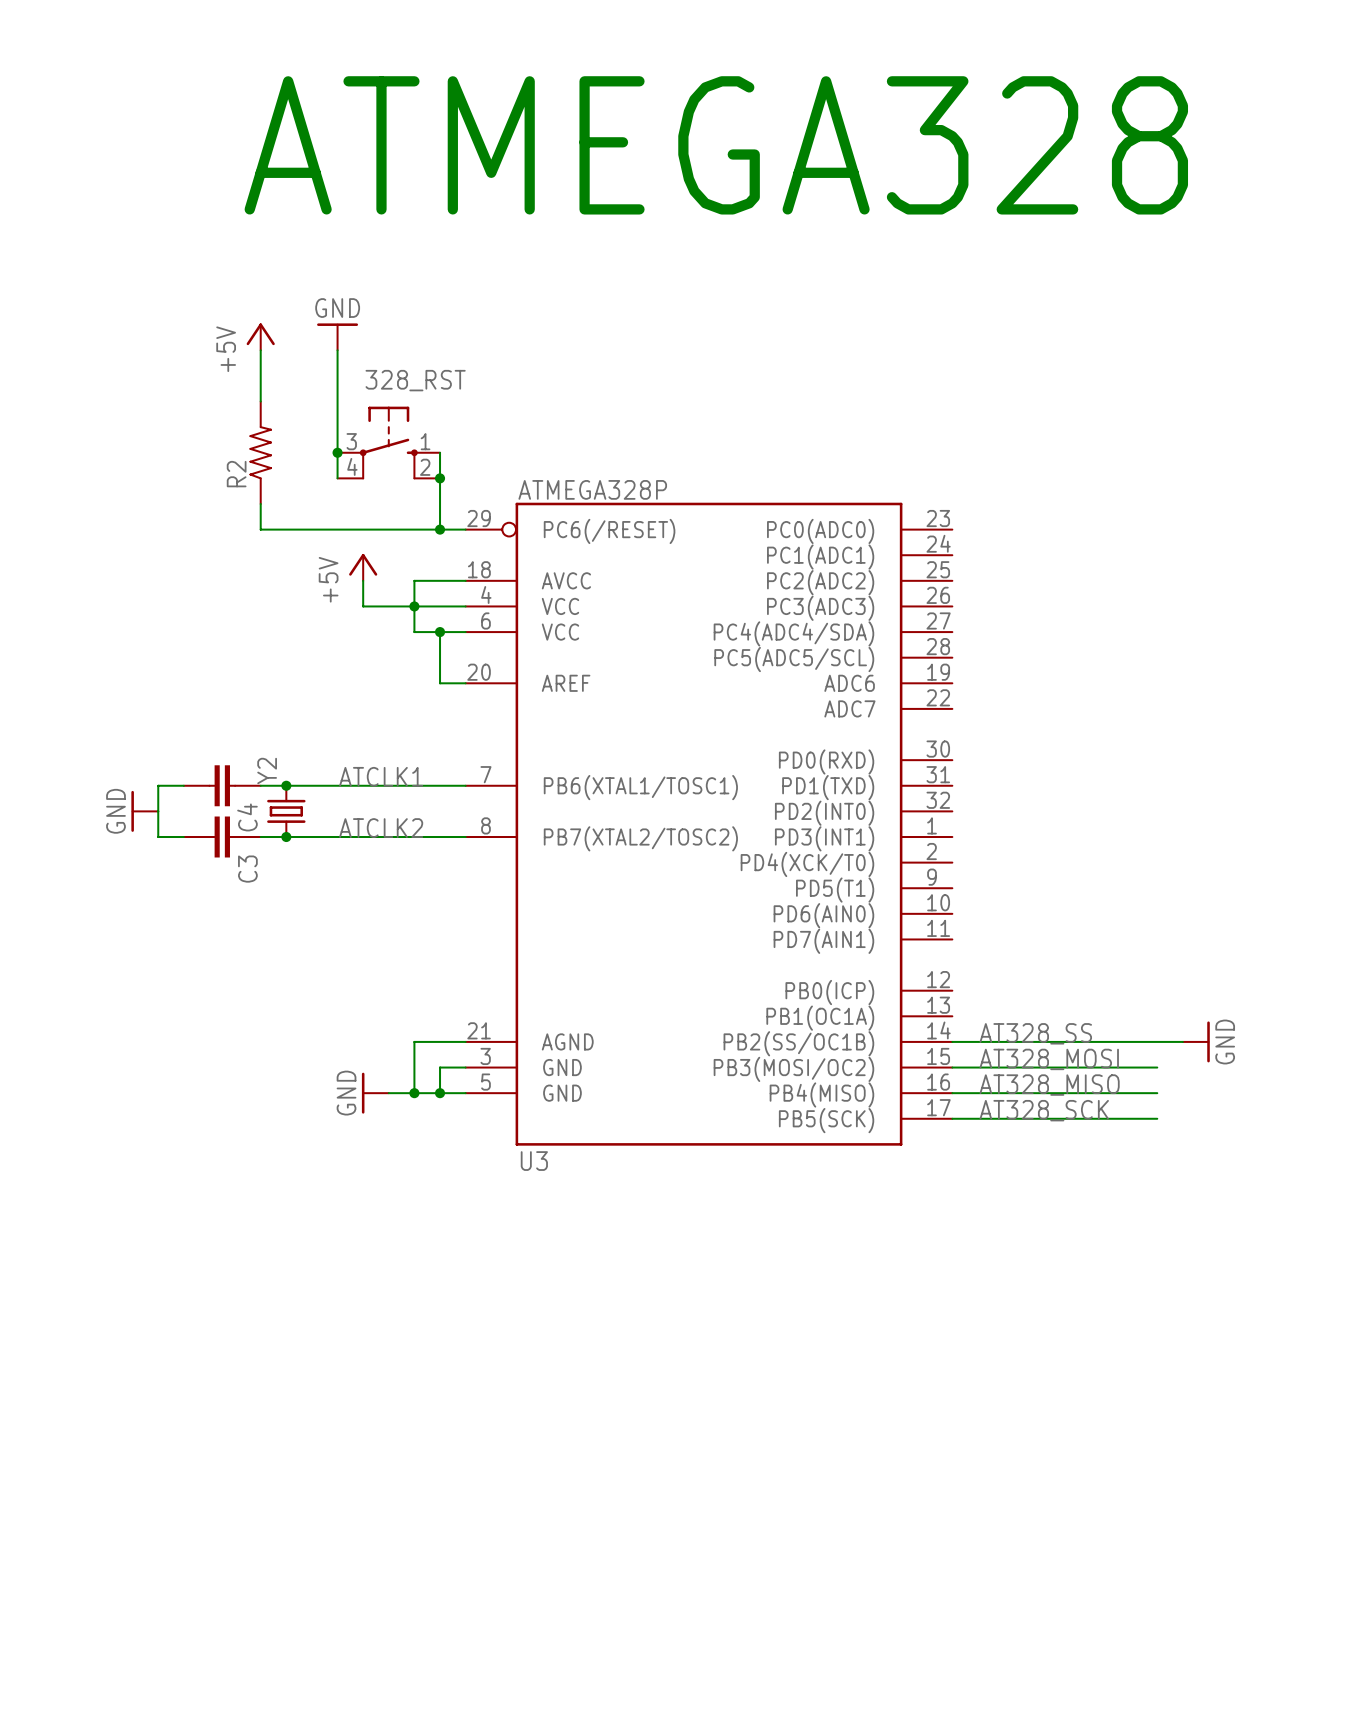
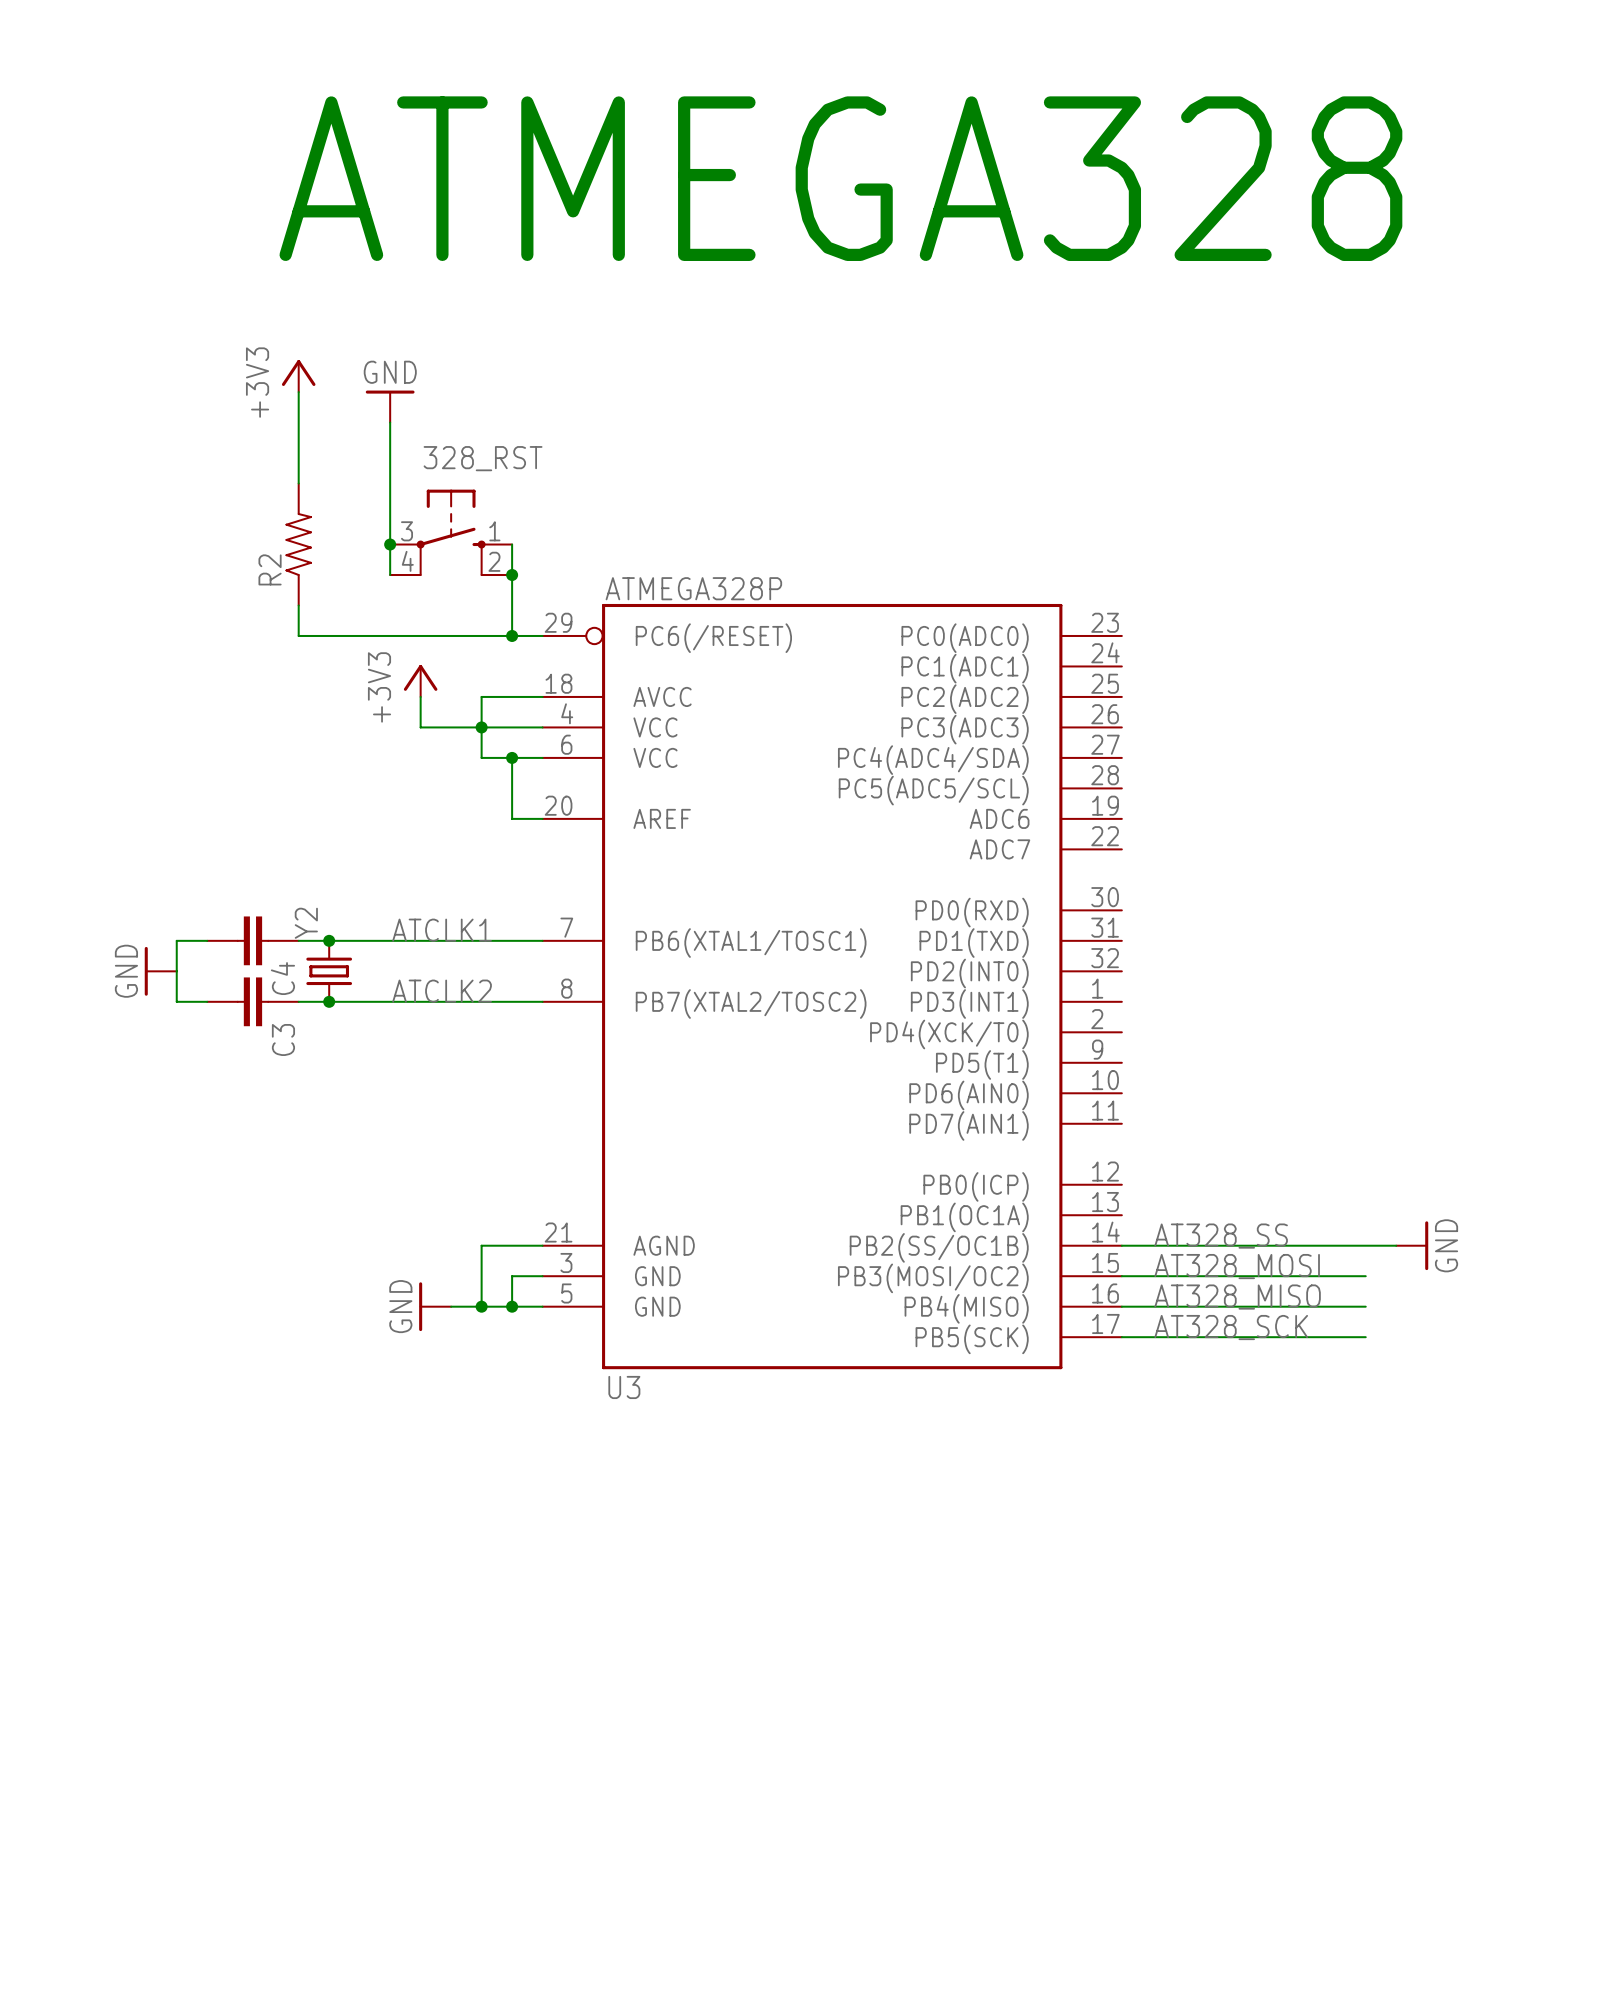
power symbol: none -> +3V3 (298, 376)
power symbol: +5V (260, 336) -> none
power symbol: +5V (363, 567) -> +3V3 (420, 680)

